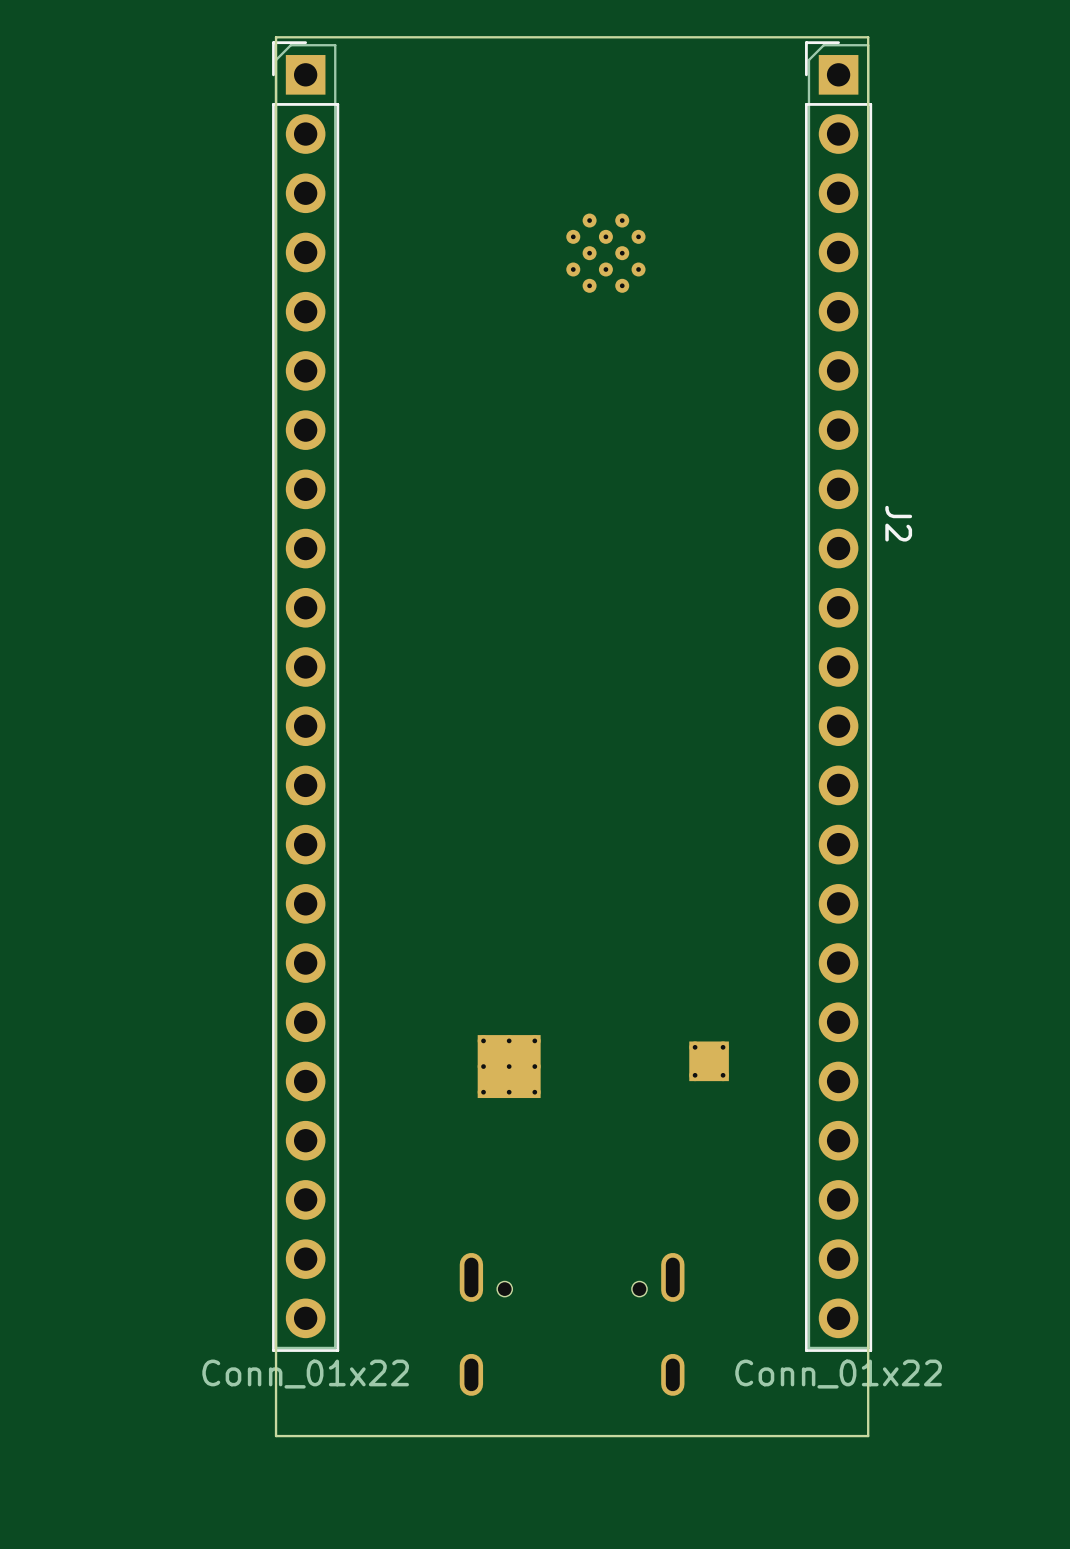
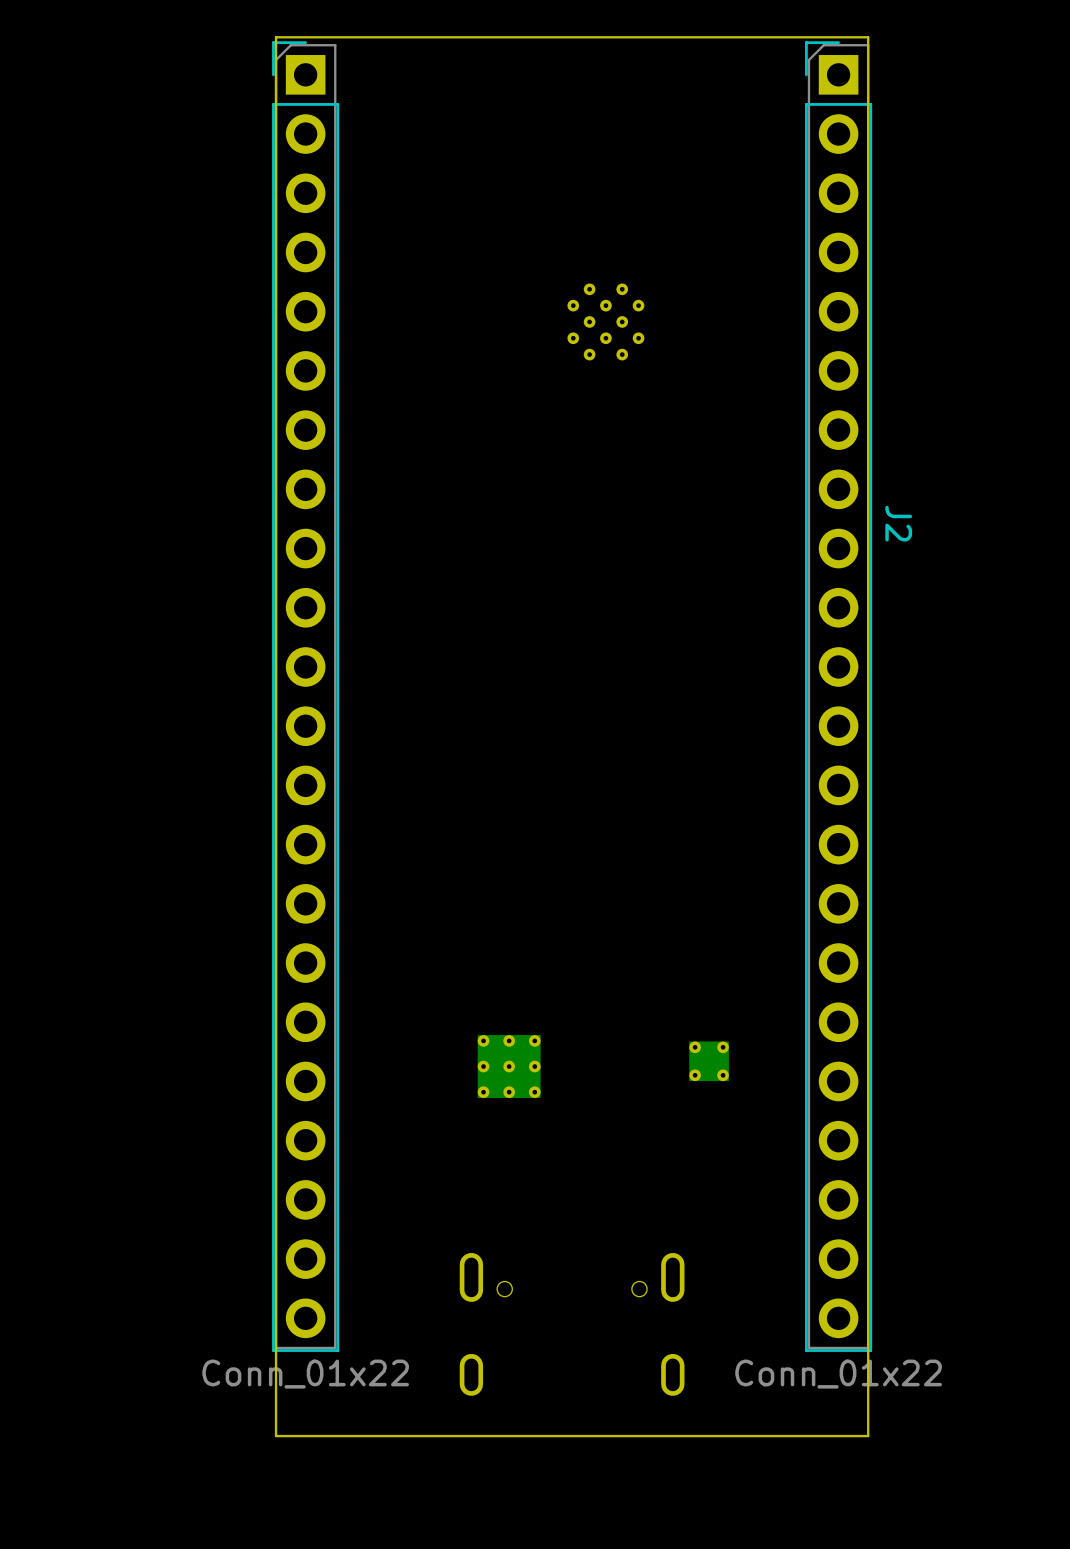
part: (605, 253) -> none
part: none -> (605, 321)

